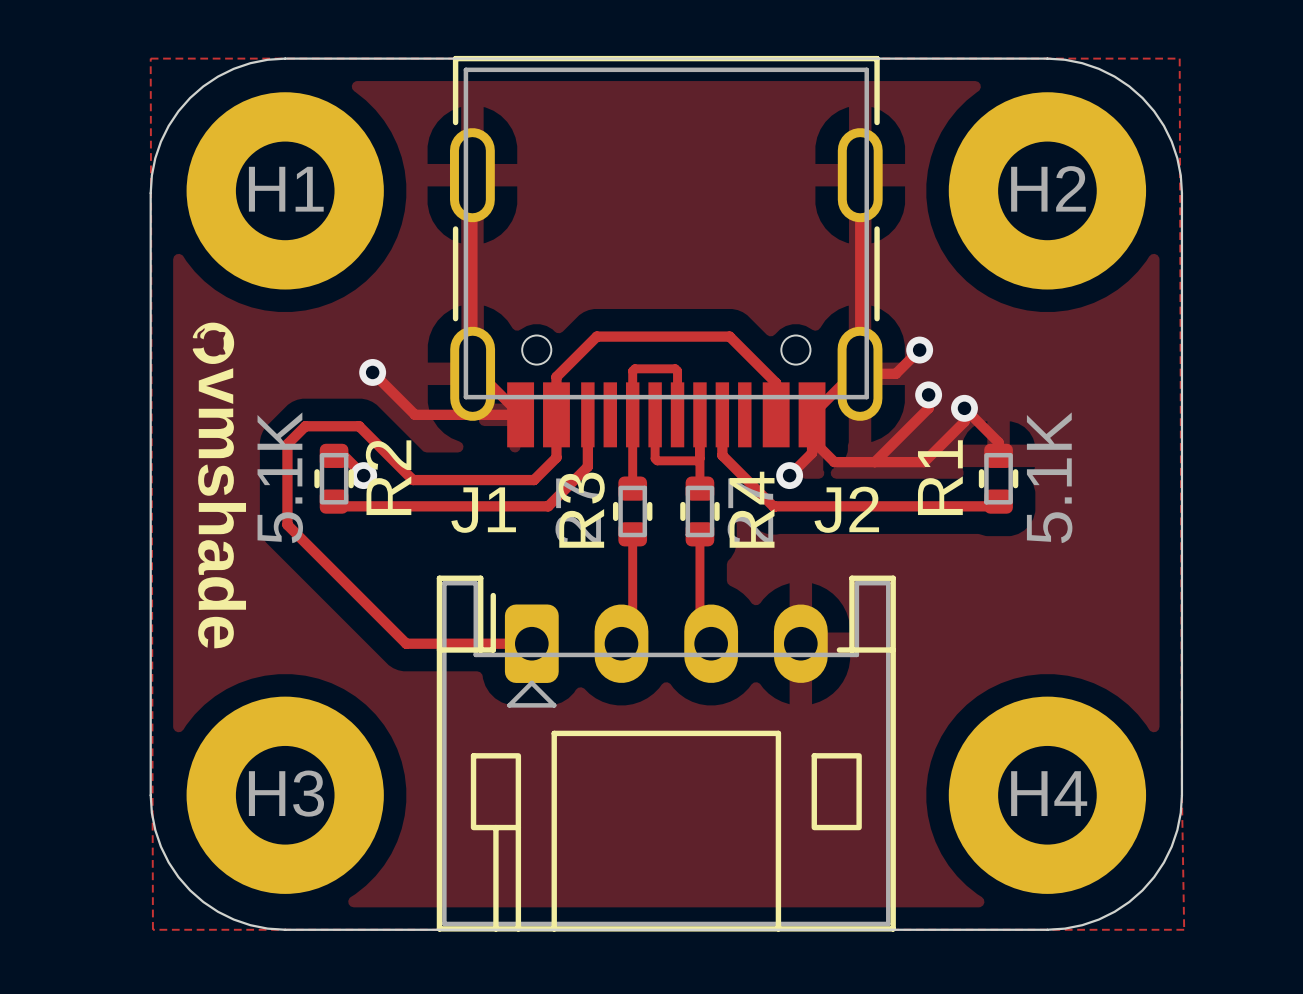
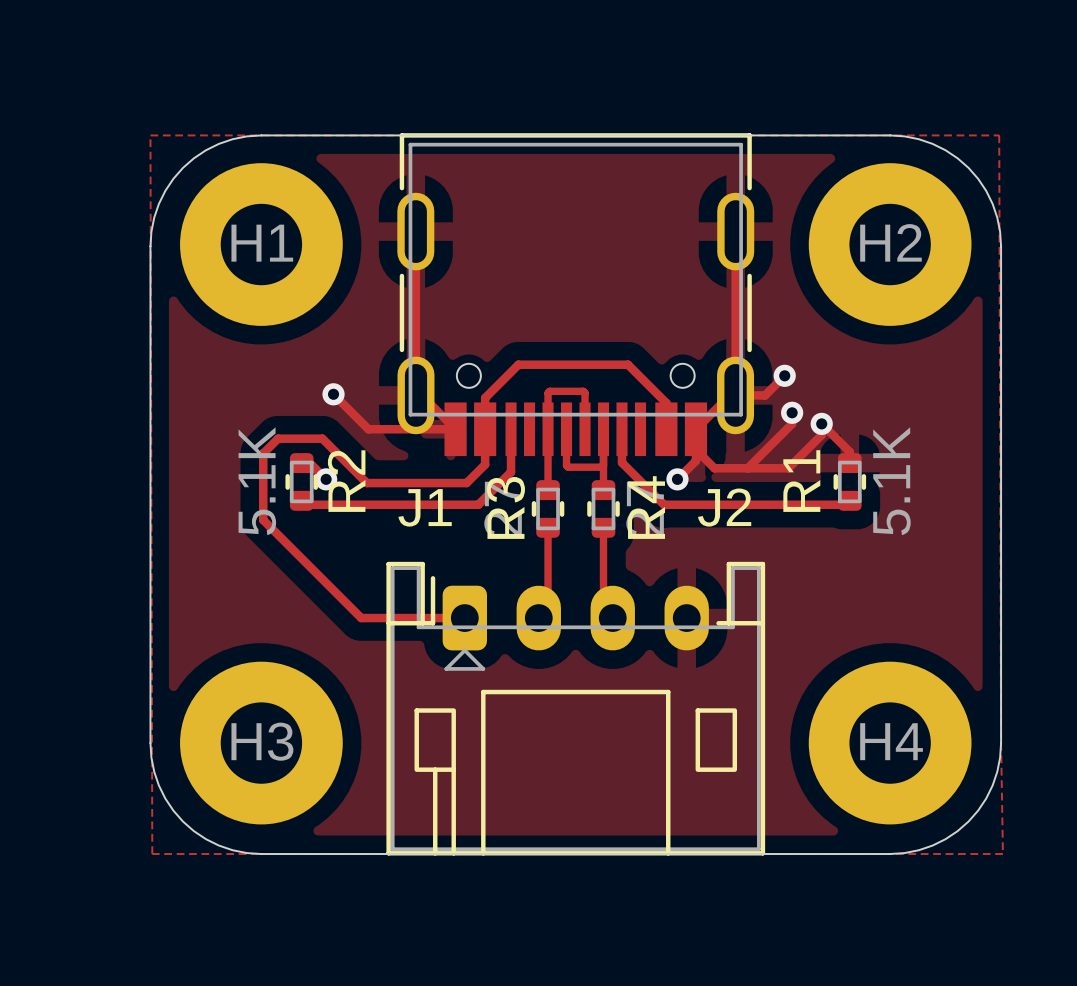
drawing: [192, 322, 235, 364] -> none
text: vmshade (222, 508) -> none

